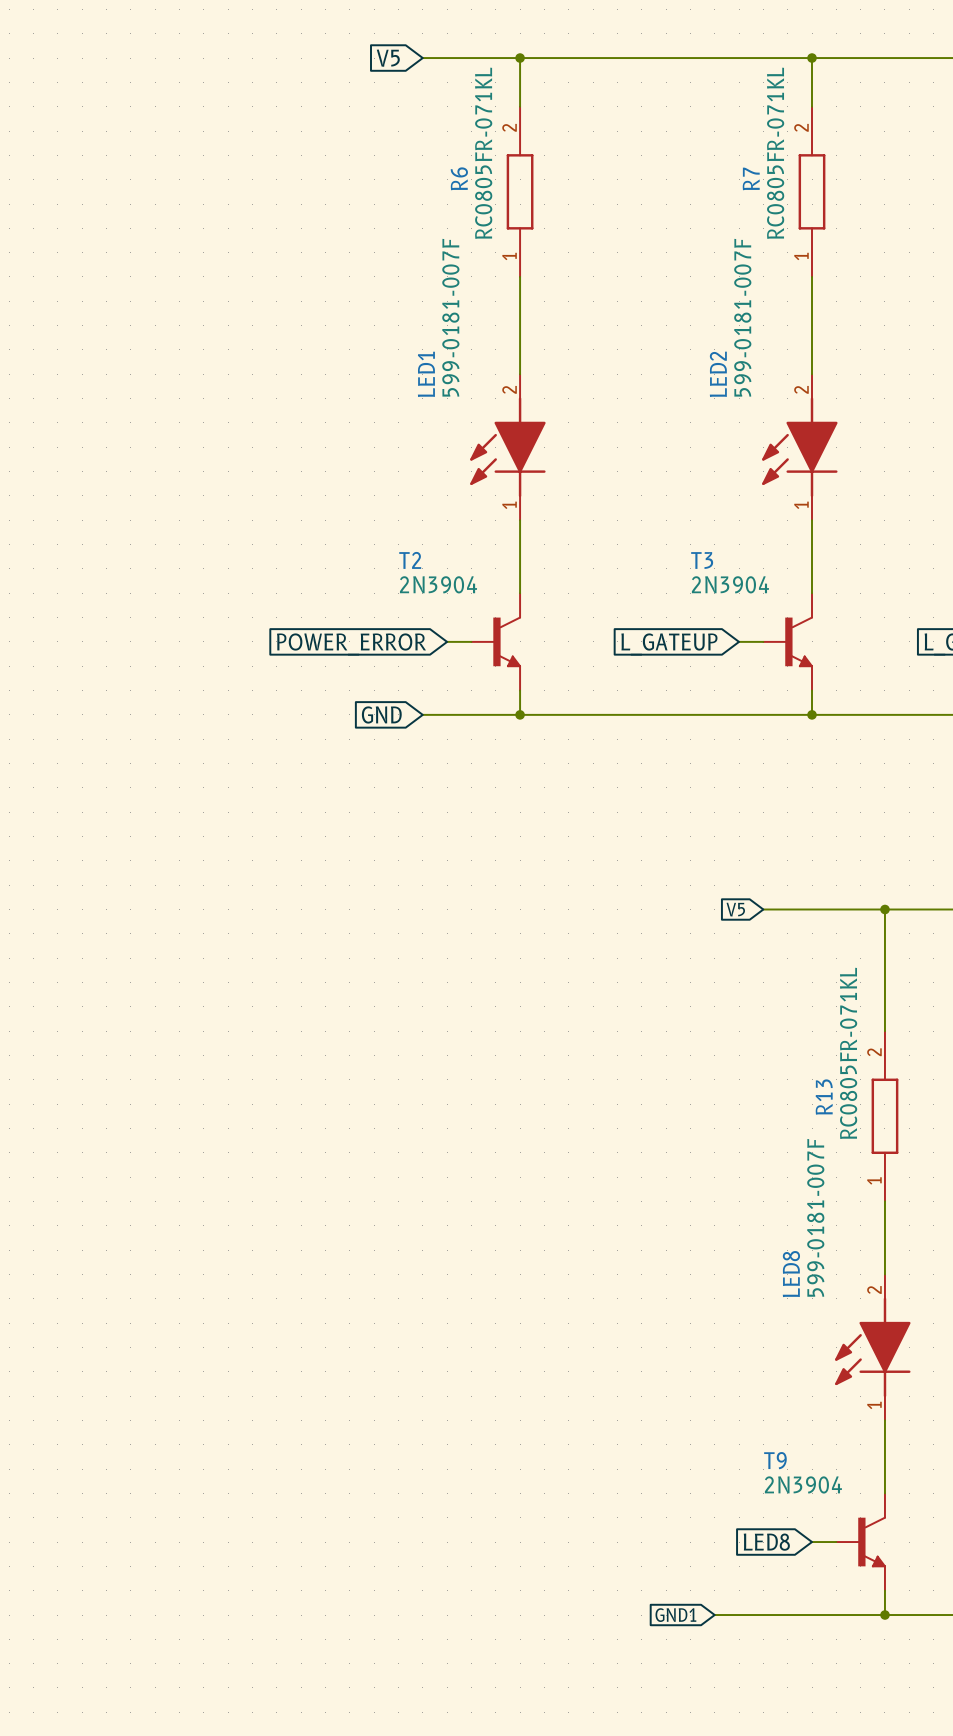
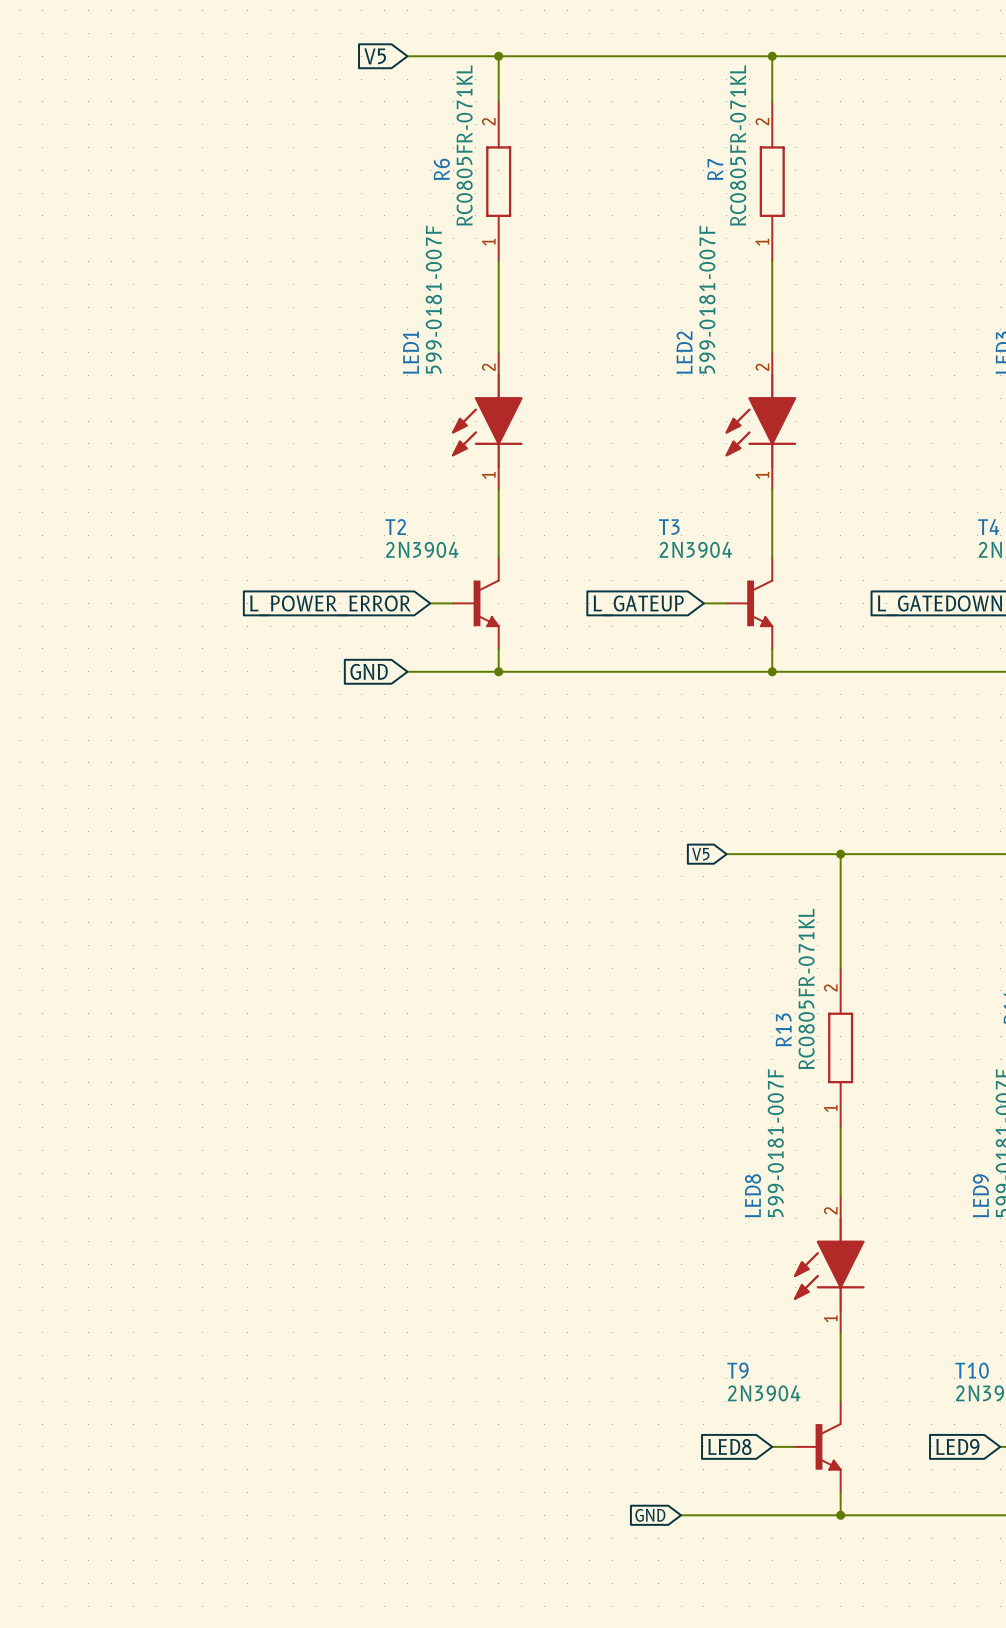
global label: POWER_ERROR (351, 644) -> L_POWER_ERROR (330, 605)
global label: GND1 (675, 1615) -> GND (650, 1515)

